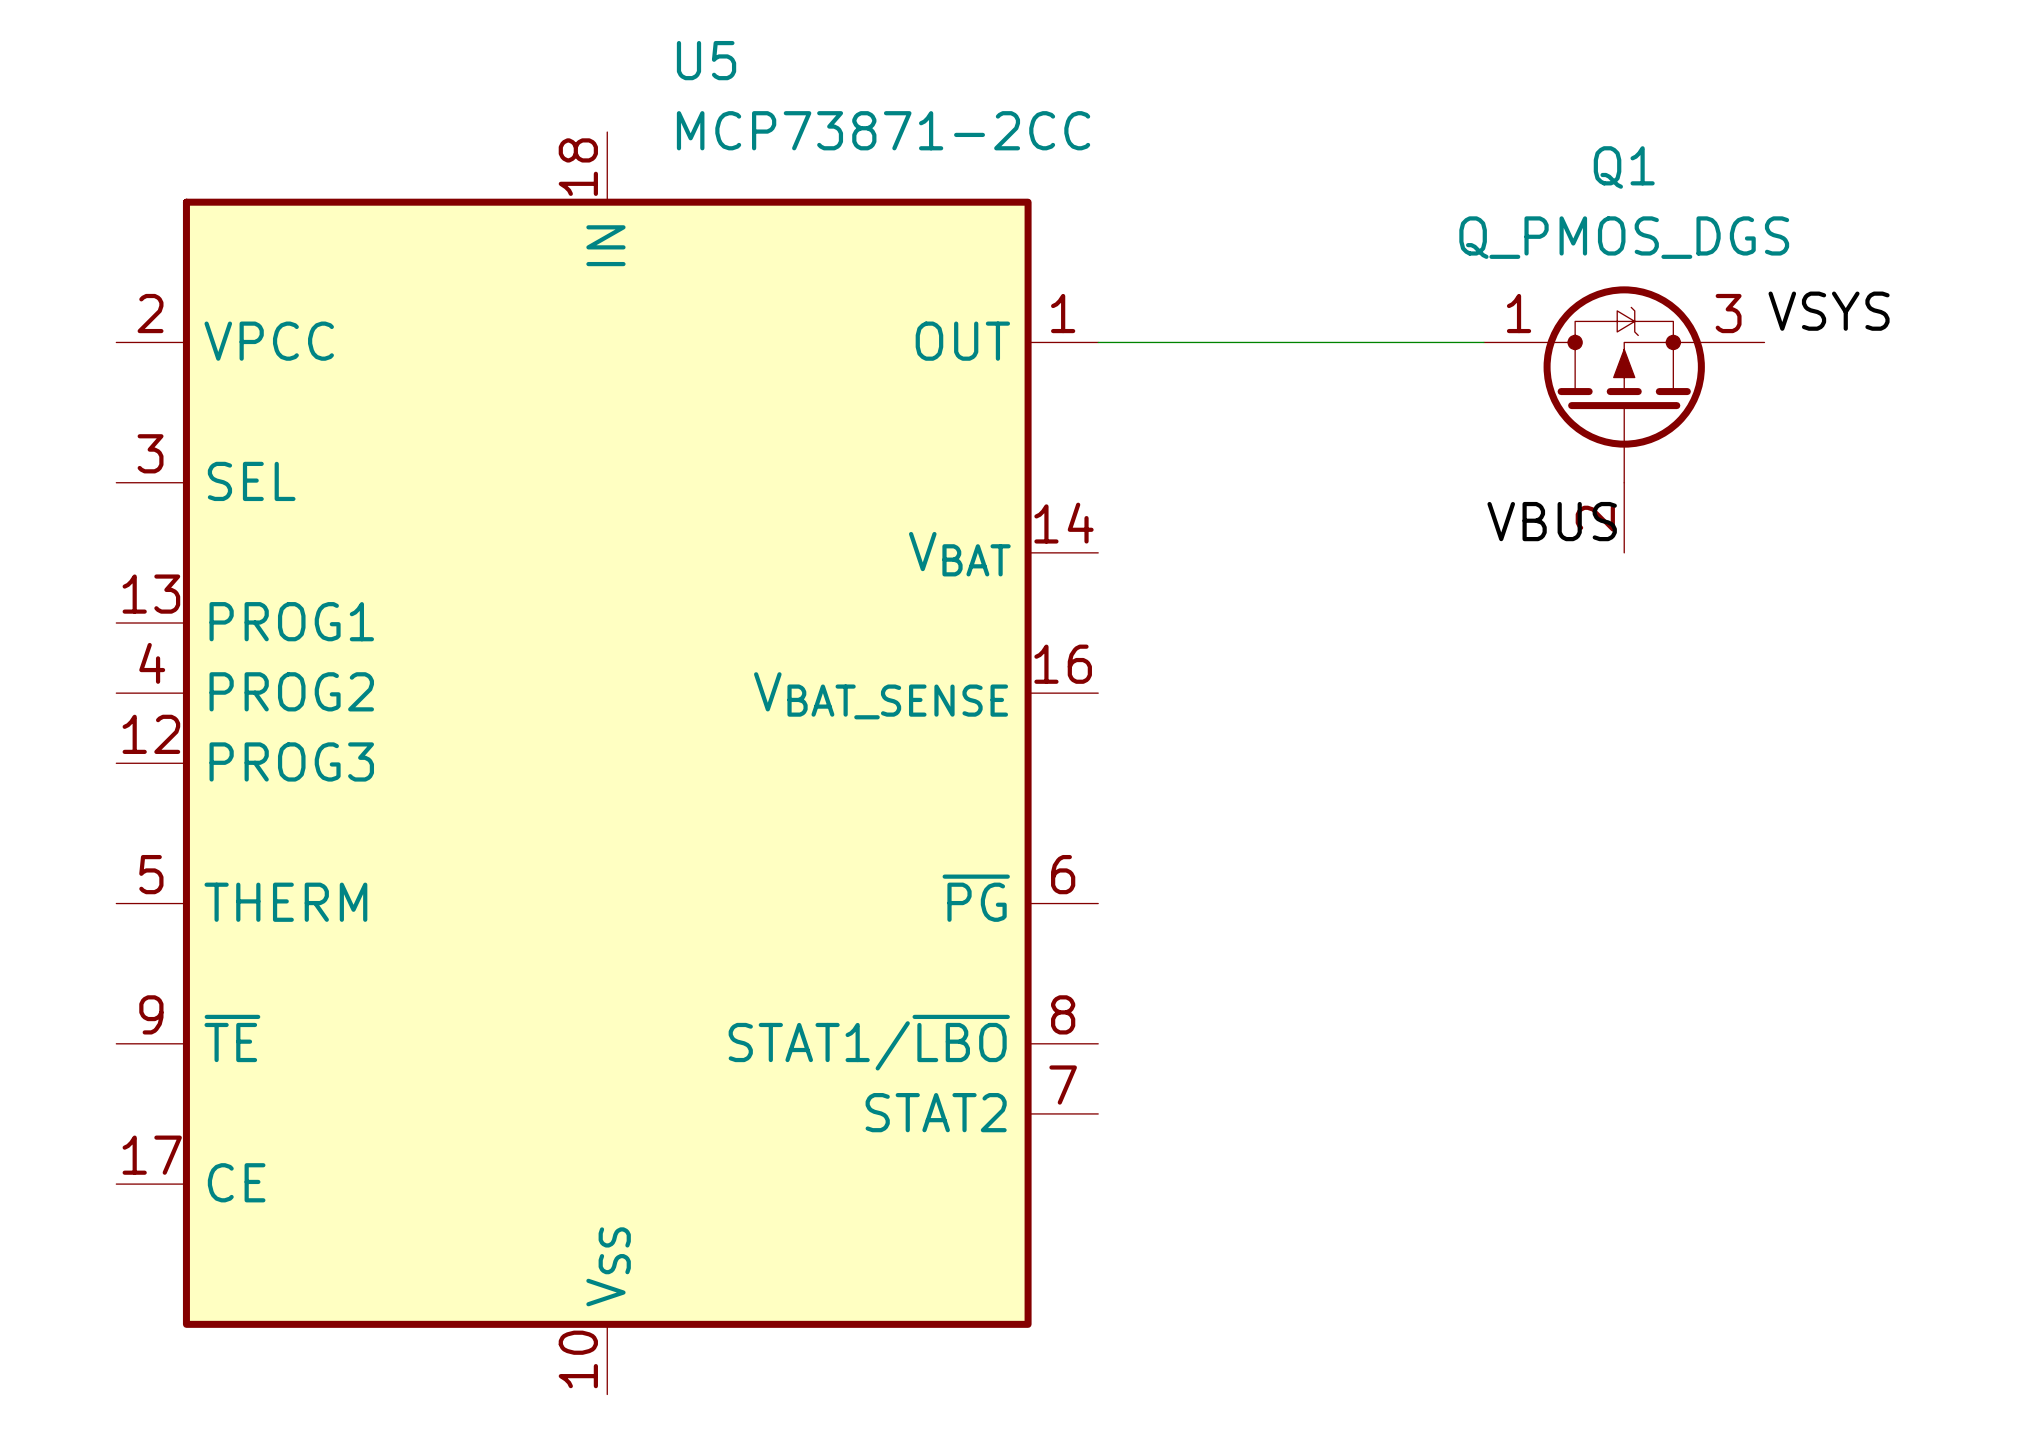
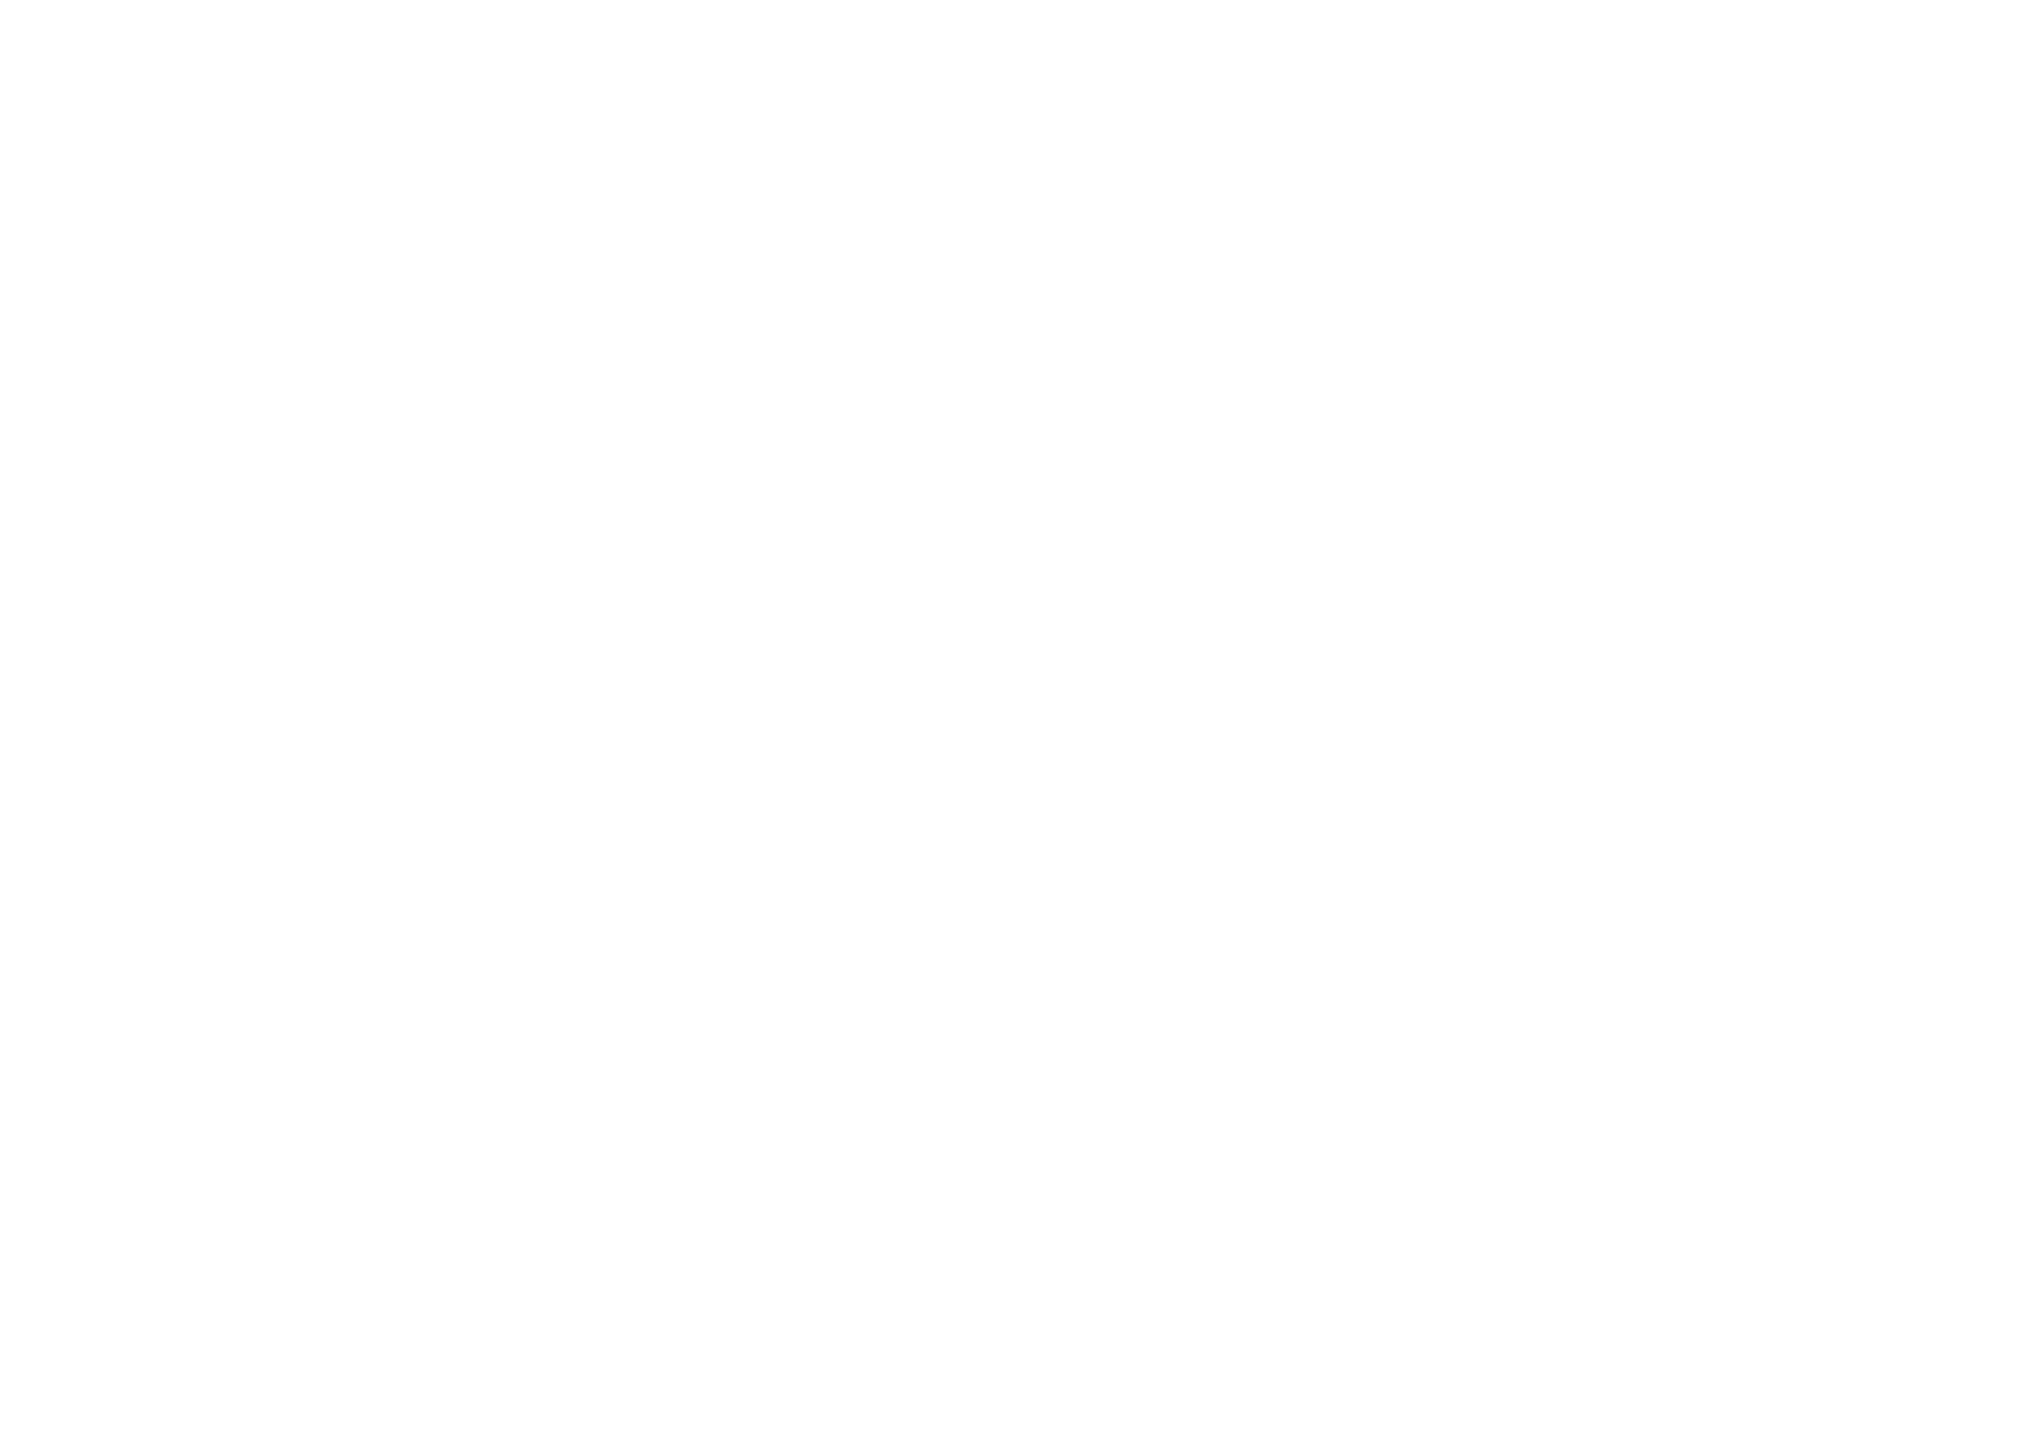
label: VSYS (1829, 311) -> none
wire: (1098, 342) (1483, 342) -> none
Q1: Q_PMOS_DGS (1624, 419) -> none
label: VBUS (1552, 521) -> none
U5: MCP73871-2CC (607, 763) -> none

